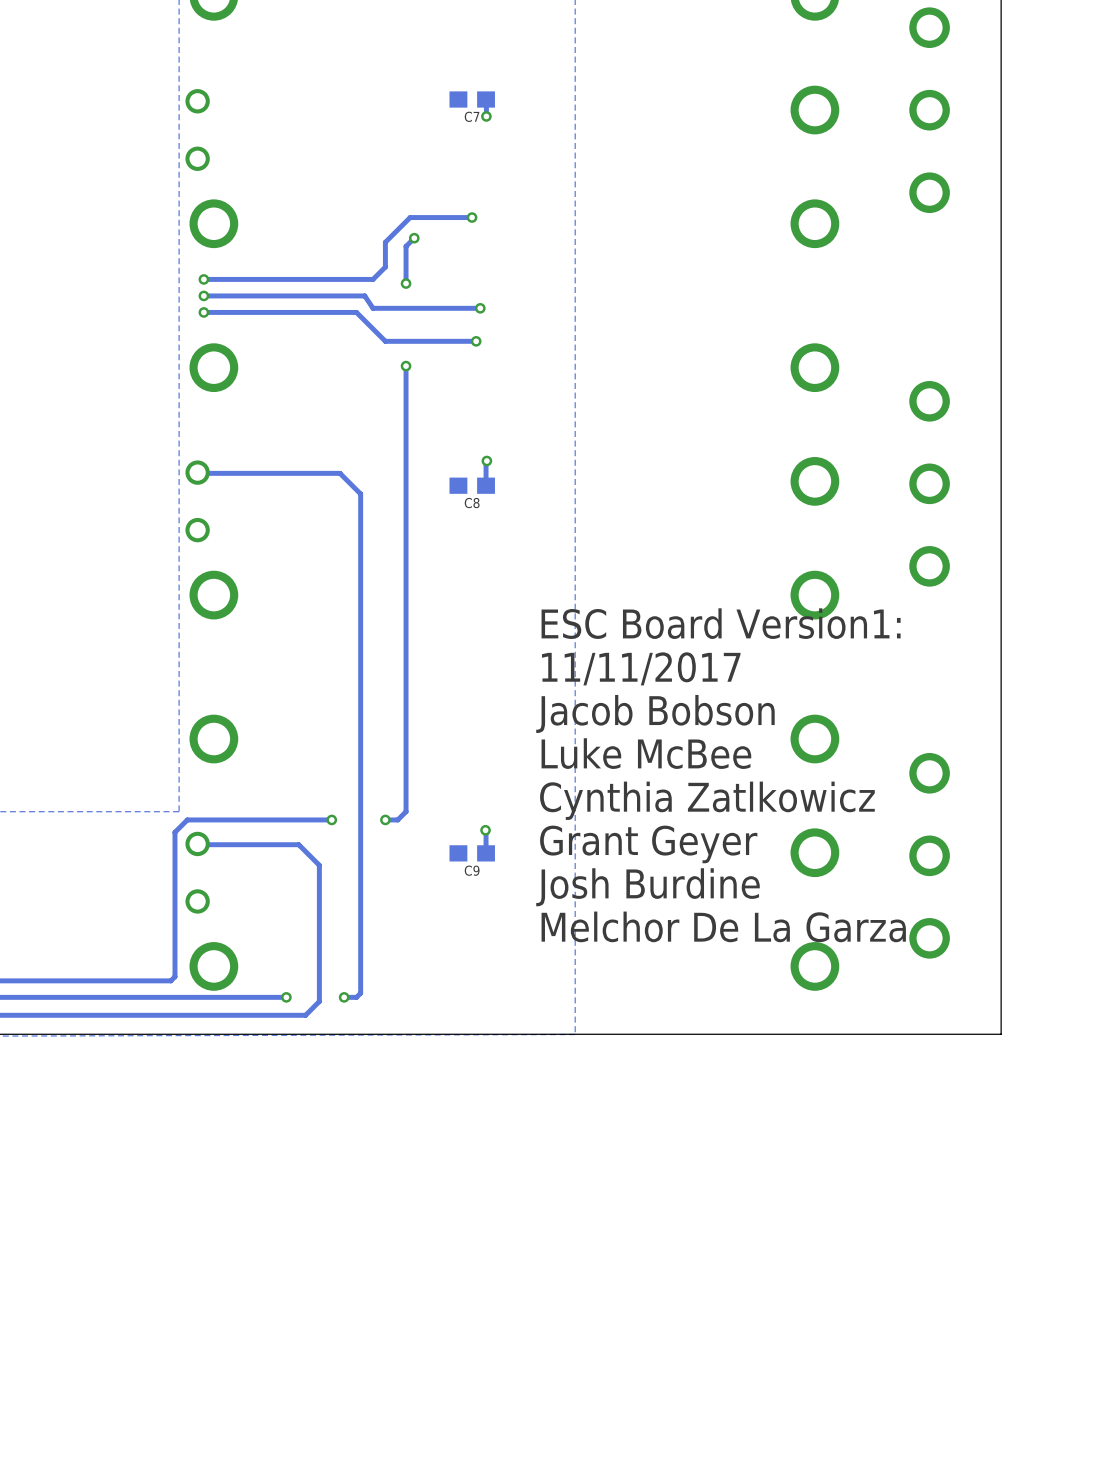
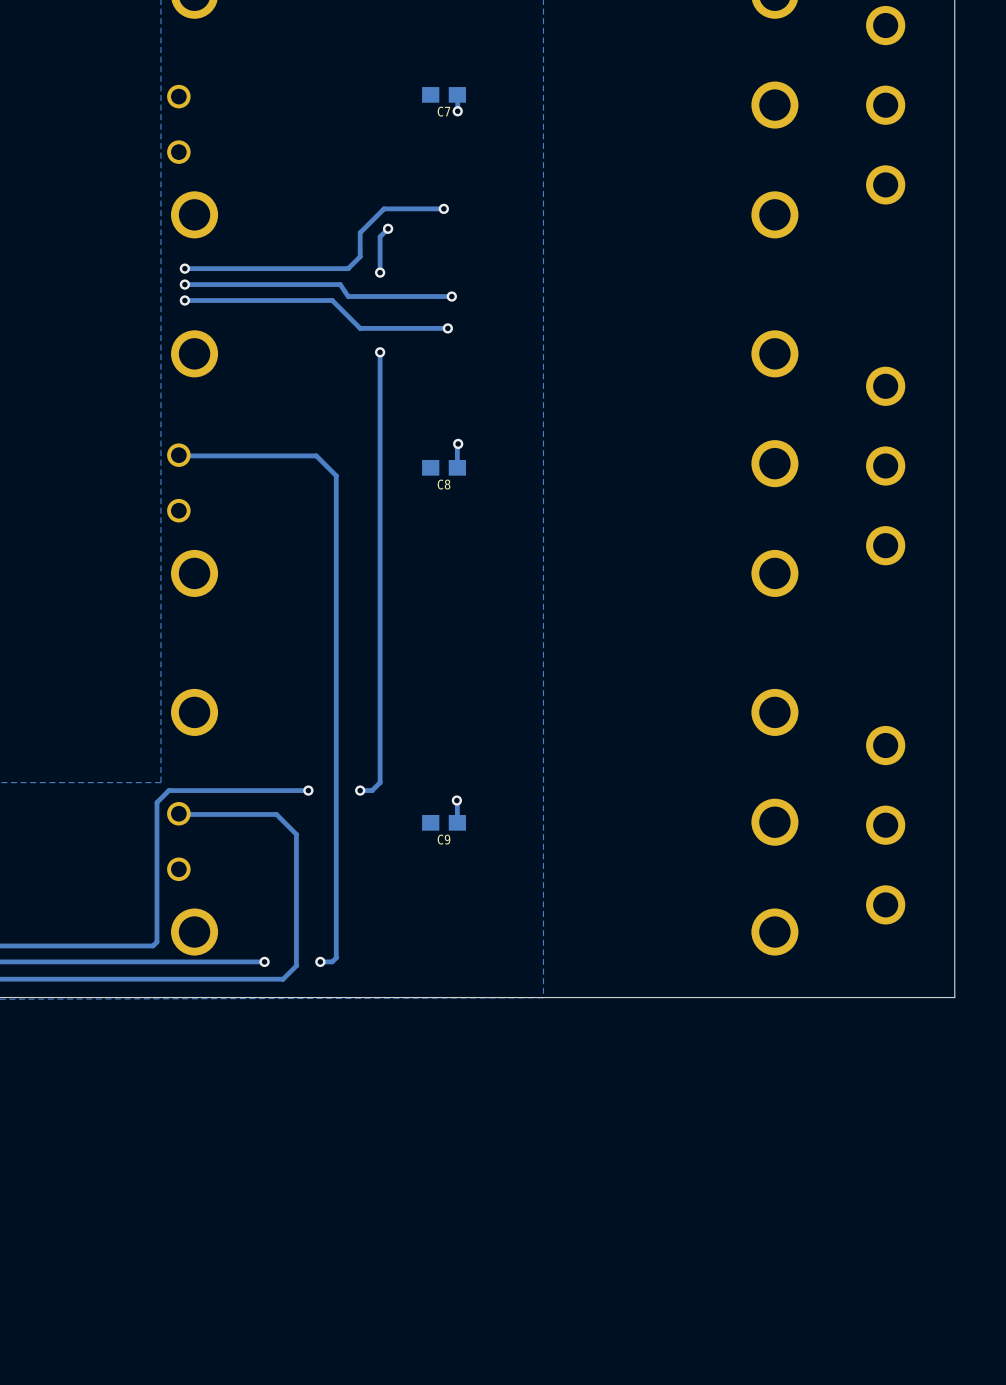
text: ESC Board Version1: (721, 623) -> none
text: 11/11/2017 (641, 668) -> none
text: Jacob Bobson (655, 713) -> none
text: Luke McBee (646, 753) -> none
text: Cynthia Zatlkowicz (707, 800) -> none
text: Grant Geyer (648, 844) -> none
text: Josh Burdine (648, 887) -> none
text: Melchor De La Garza (723, 926) -> none

